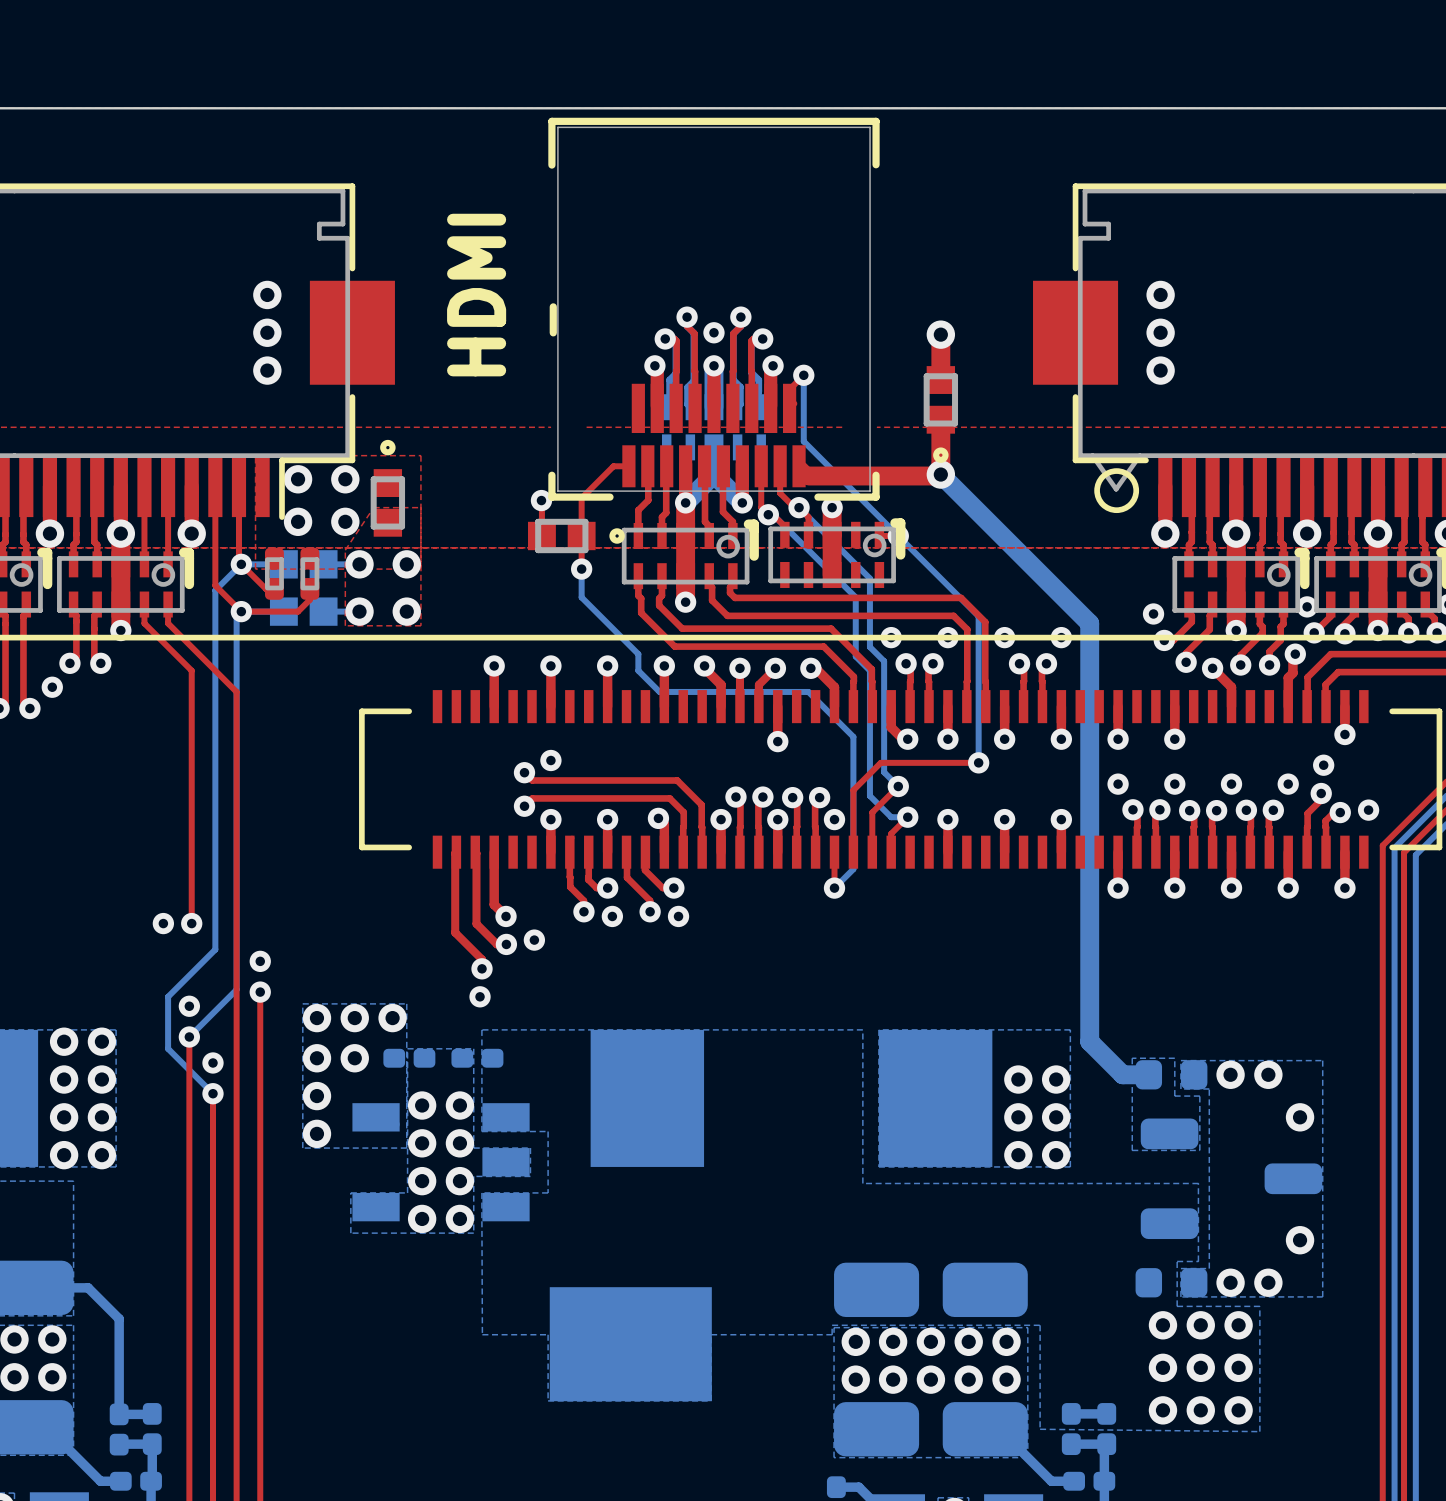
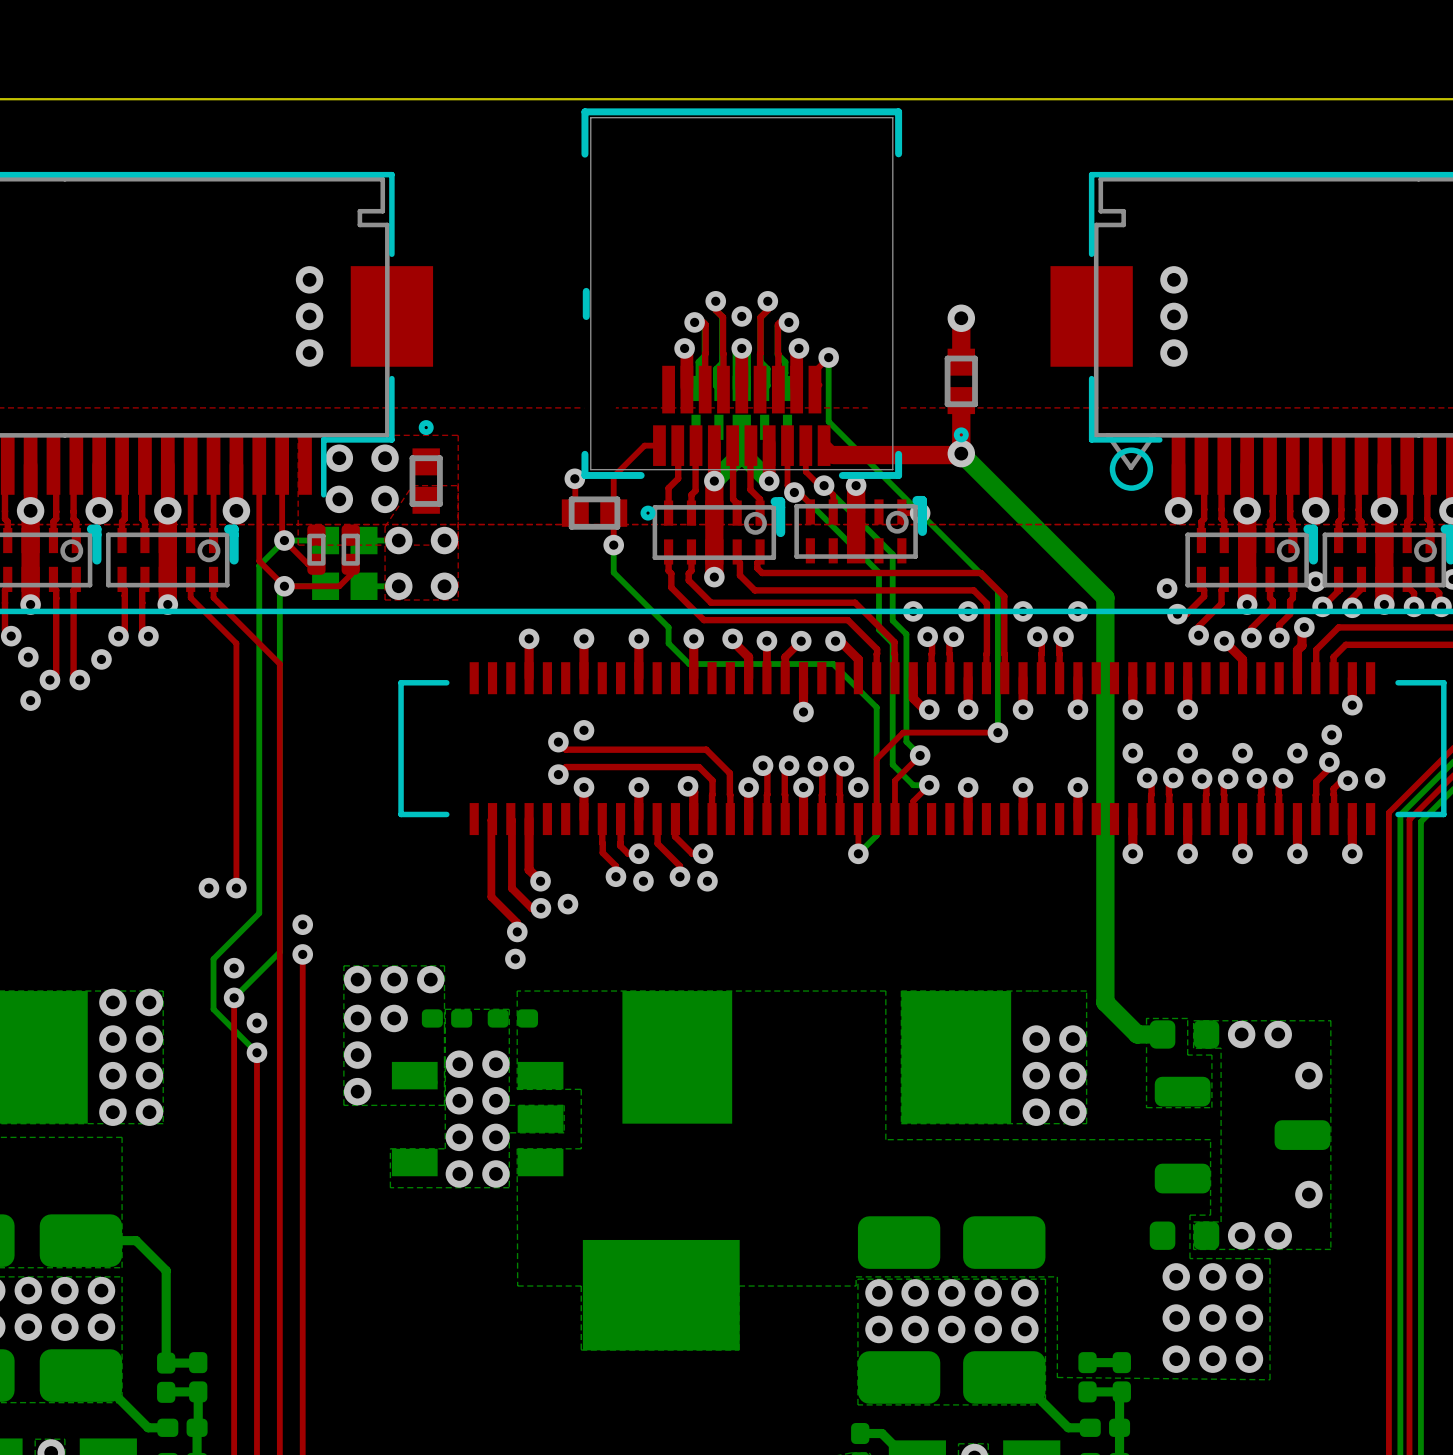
text: HDMI (476, 295) -> none

